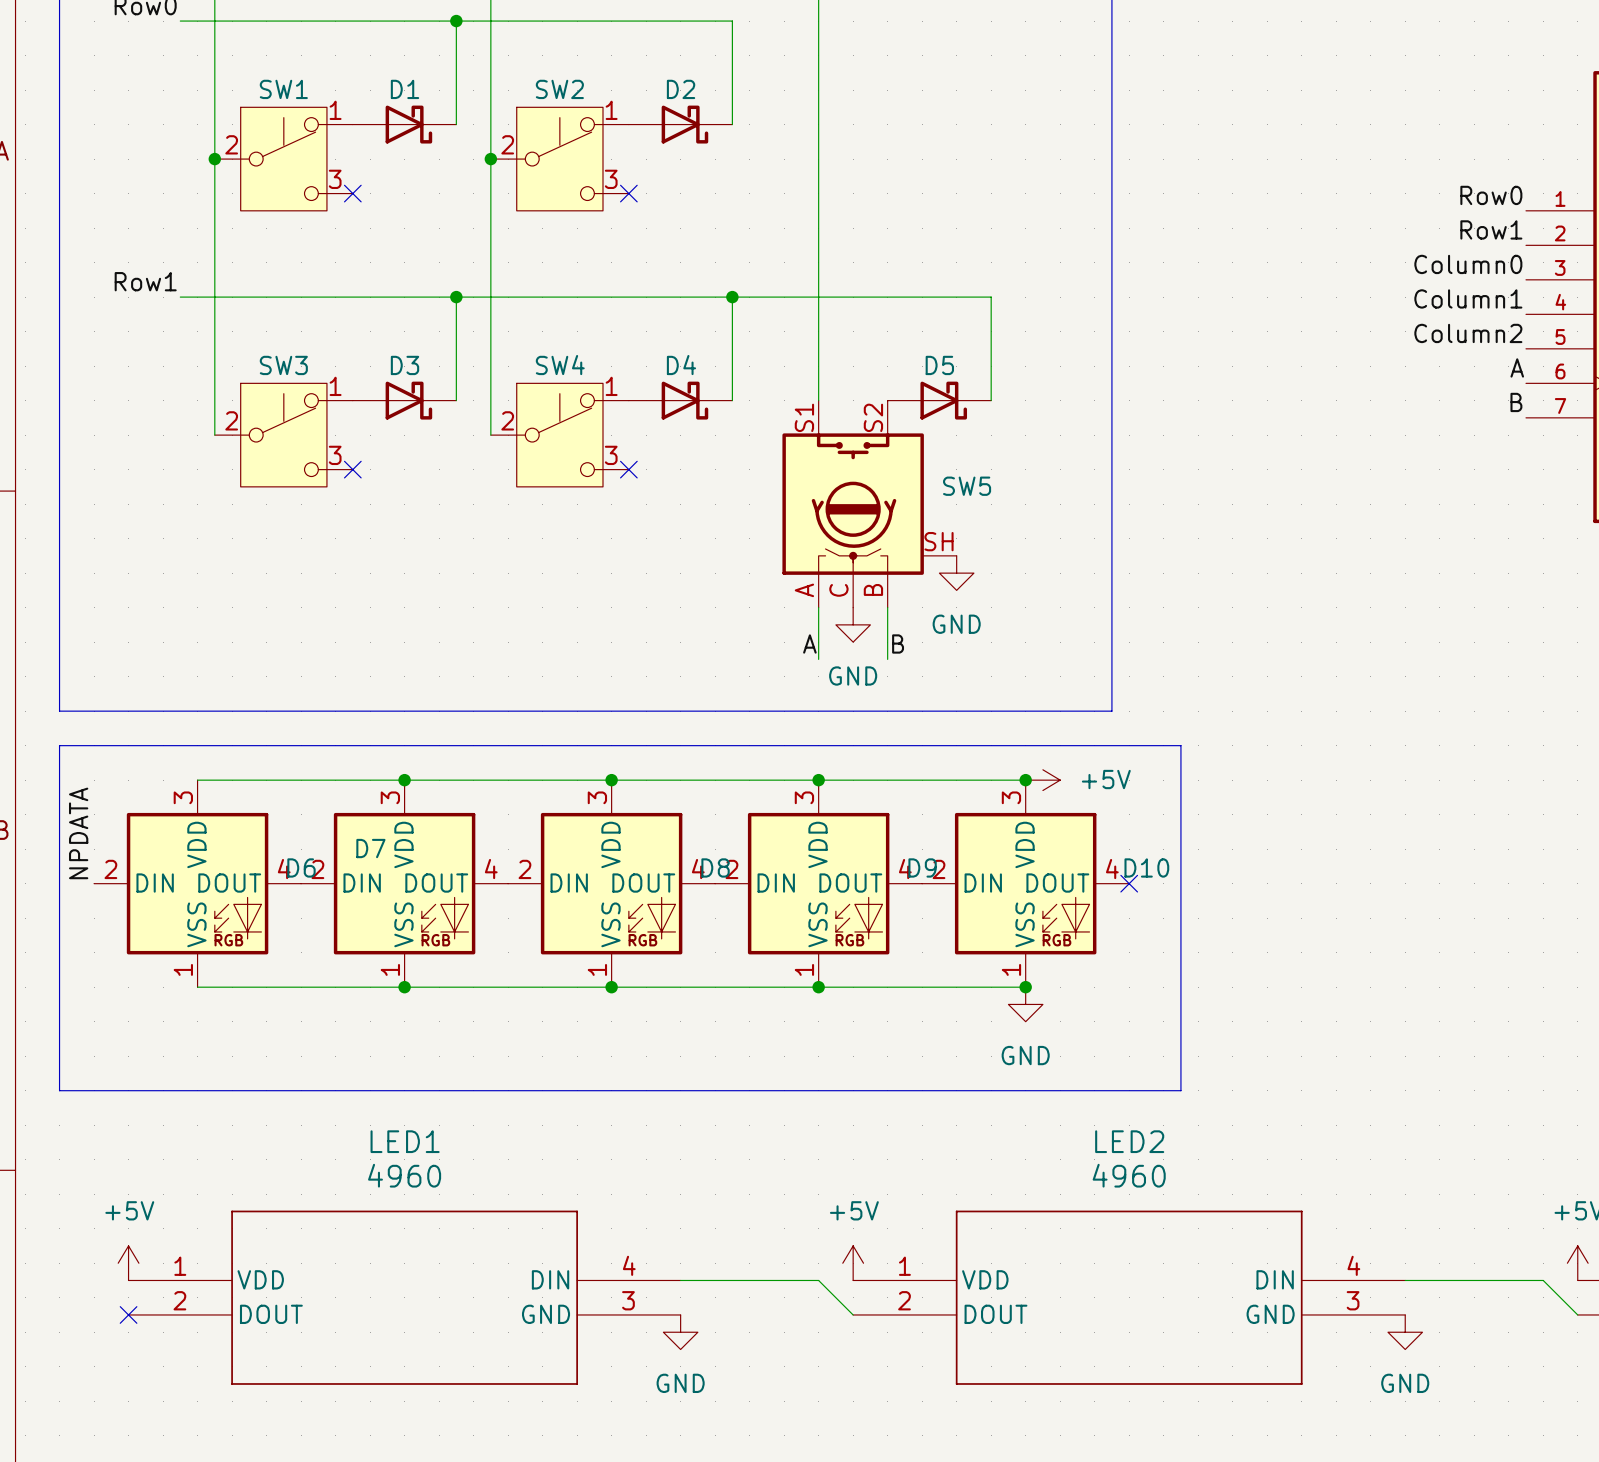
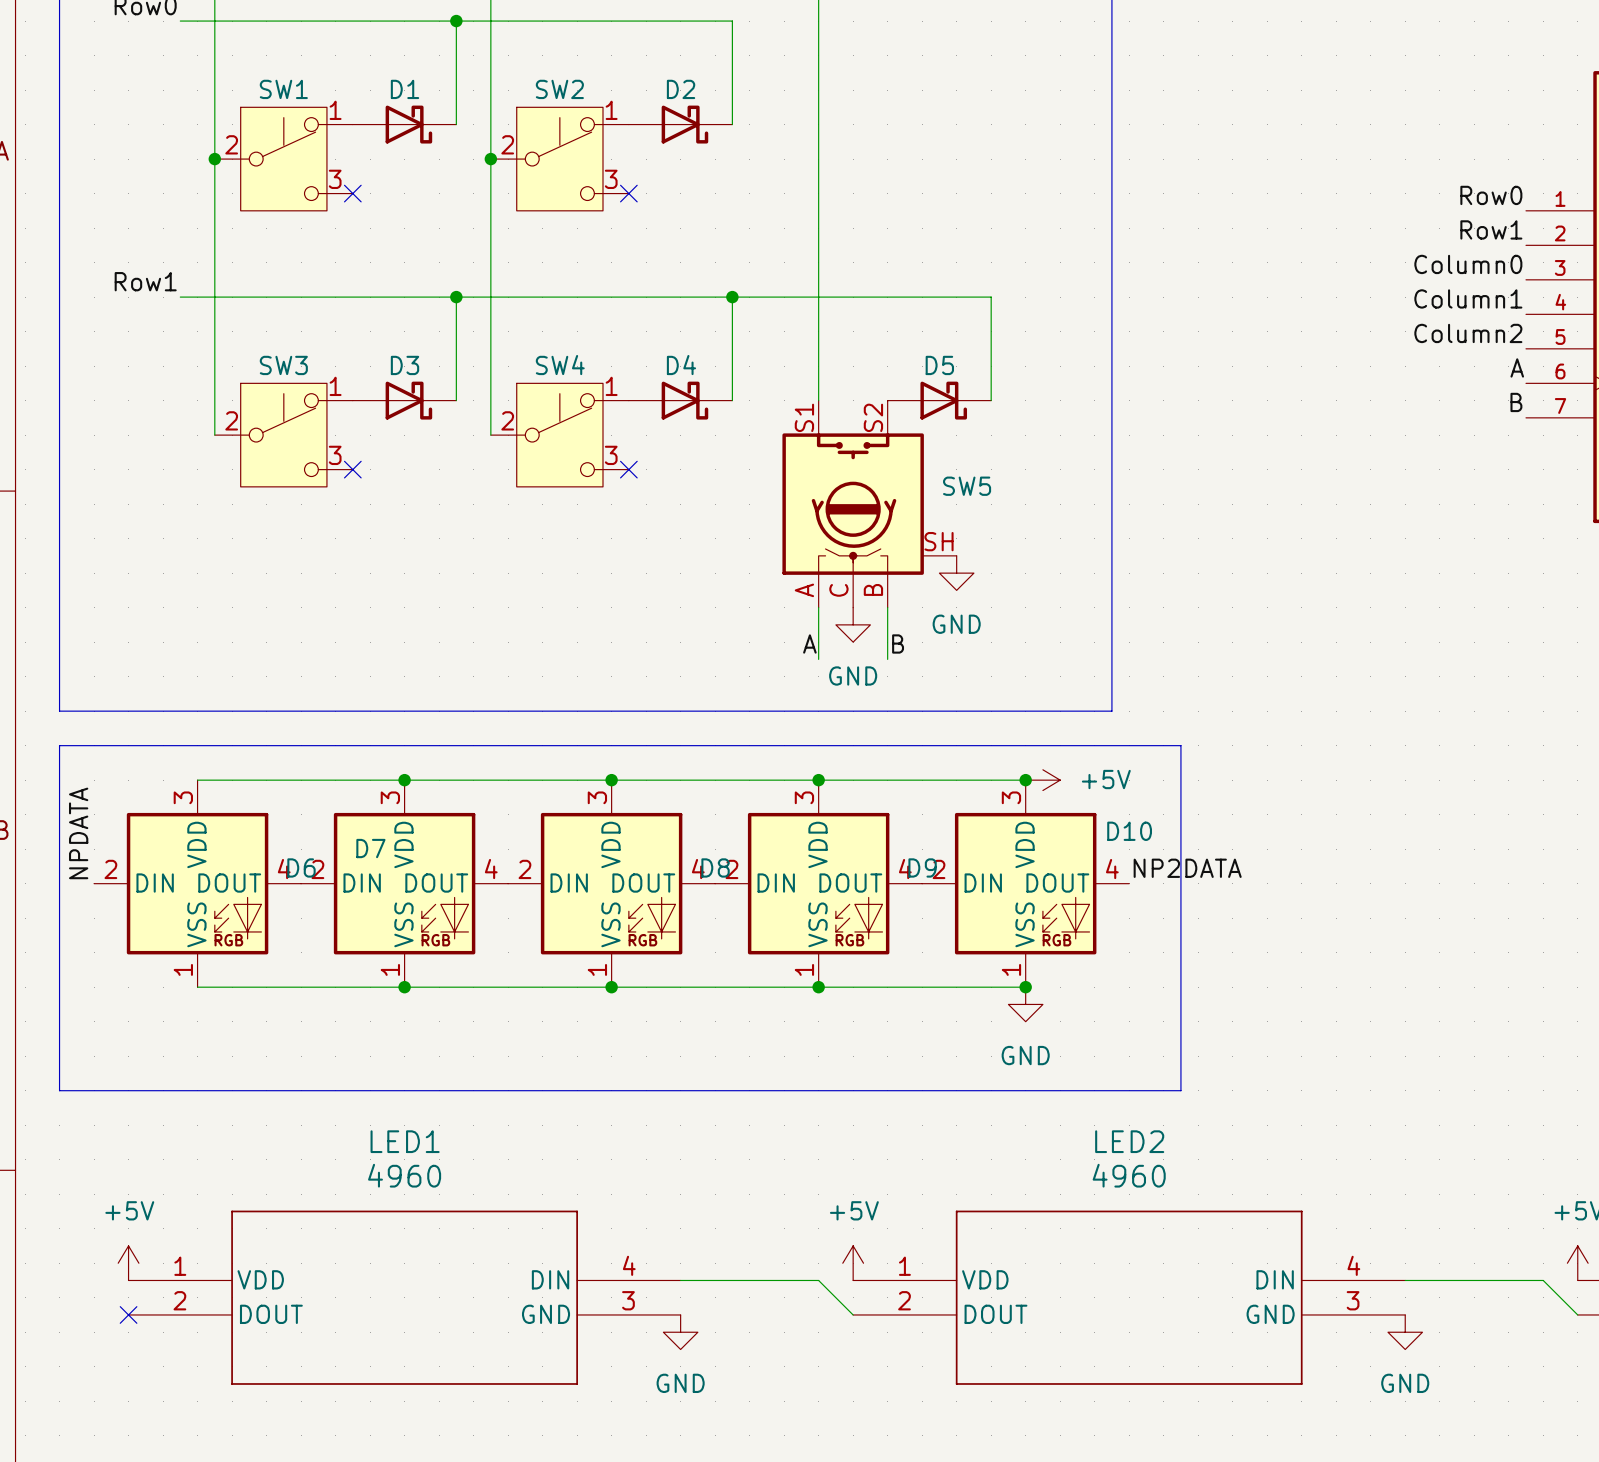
D10 name position: D10 (1146, 867) -> D10 (1129, 831)
label: none -> NP2DATA (1187, 868)
no-connect mark: (1129, 883) -> none

